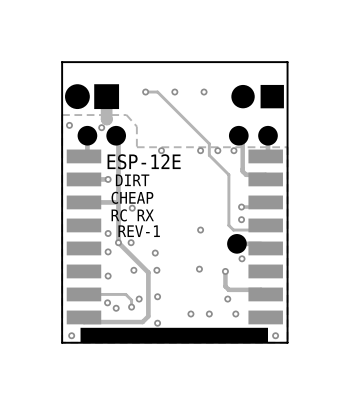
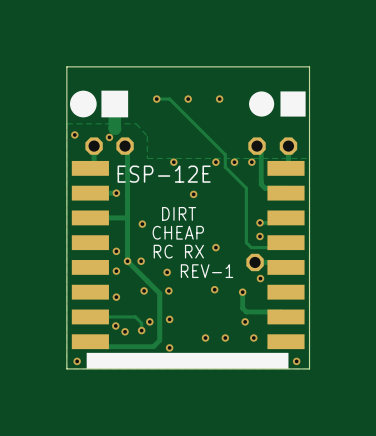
part footprint: [77, 125, 98, 146] -> [85, 137, 103, 155]
part footprint: [106, 125, 127, 146] -> [116, 137, 134, 155]
part footprint: [228, 125, 249, 146] -> [248, 137, 266, 155]
part footprint: [258, 125, 278, 146] -> [279, 137, 298, 155]
text position: DIRT (132, 180) -> DIRT (179, 213)
via: none -> (193, 194)
text position: CHEAP (132, 197) -> CHEAP (178, 232)
text position: RC RX (132, 215) -> RC RX (178, 251)
text position: REV-1 (139, 231) -> REV-1 (207, 271)
part footprint: [227, 234, 247, 254] -> [246, 253, 264, 272]

